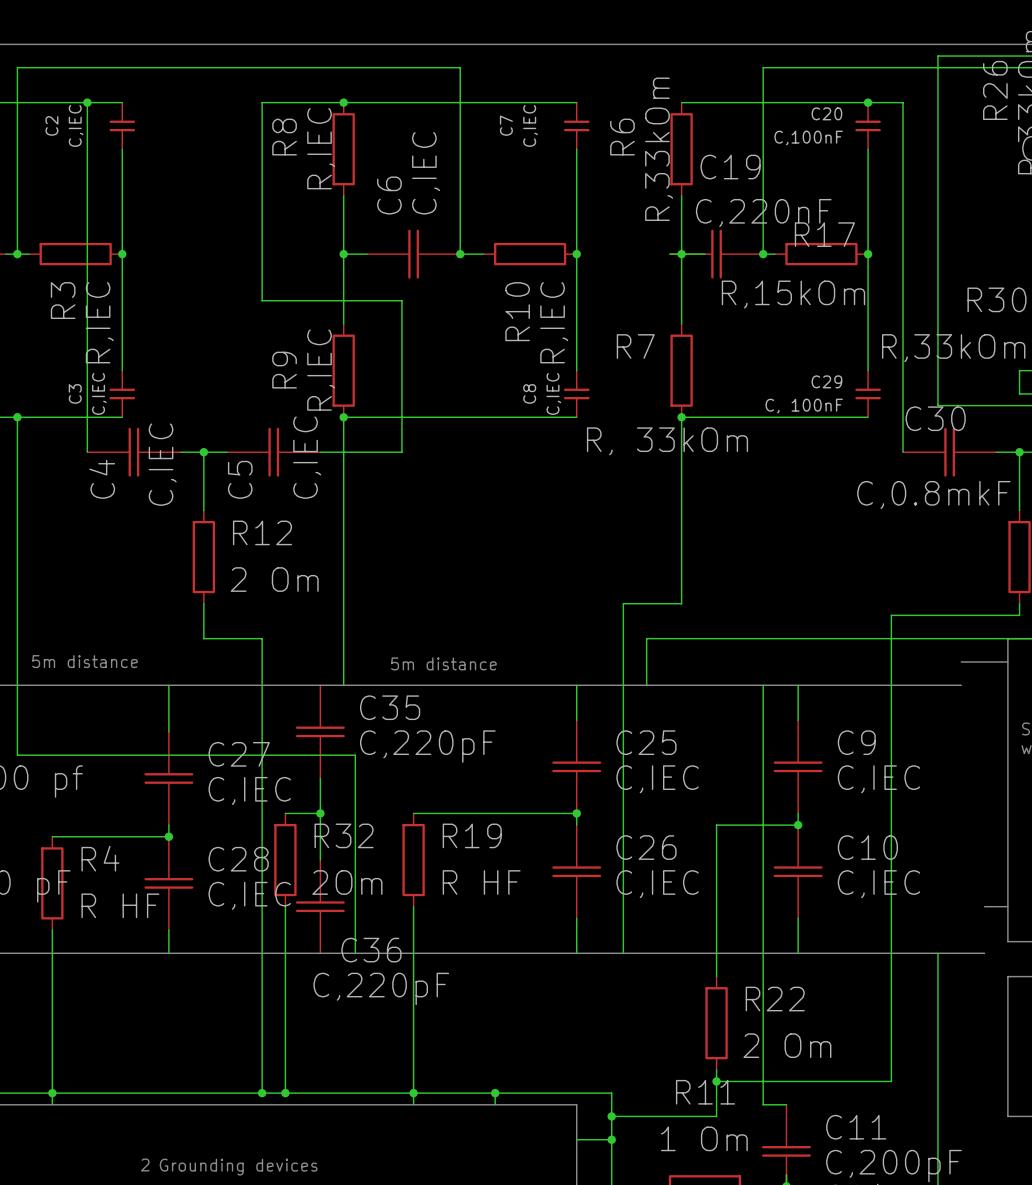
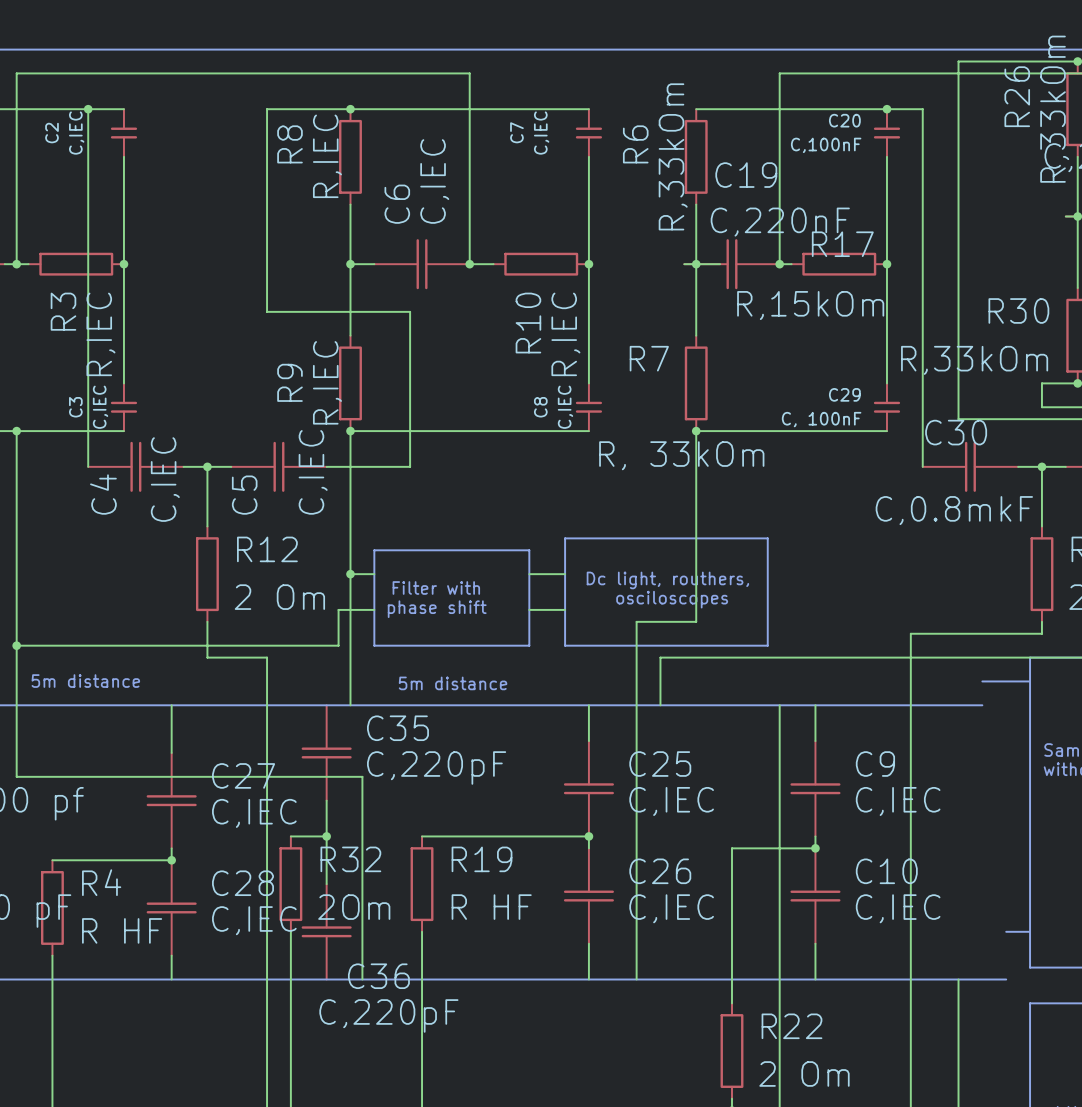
line: none -> (565, 538) (767, 538) (767, 645) (565, 645) (565, 538)
line: none -> (374, 550) (529, 550) (529, 645) (374, 645) (374, 550)
wire: none -> (350, 574) (374, 574)
junction: none -> (350, 574)
wire: none -> (529, 574) (565, 574)
text: none -> Dc light, routhers, (667, 580)
text: none -> Filter with (436, 587)
text: none -> osciloscopes (672, 599)
text: none -> phase shift (437, 609)
wire: none -> (374, 609) (338, 609) (338, 645) (16, 645)
wire: none -> (529, 609) (565, 609)
junction: none -> (16, 645)

